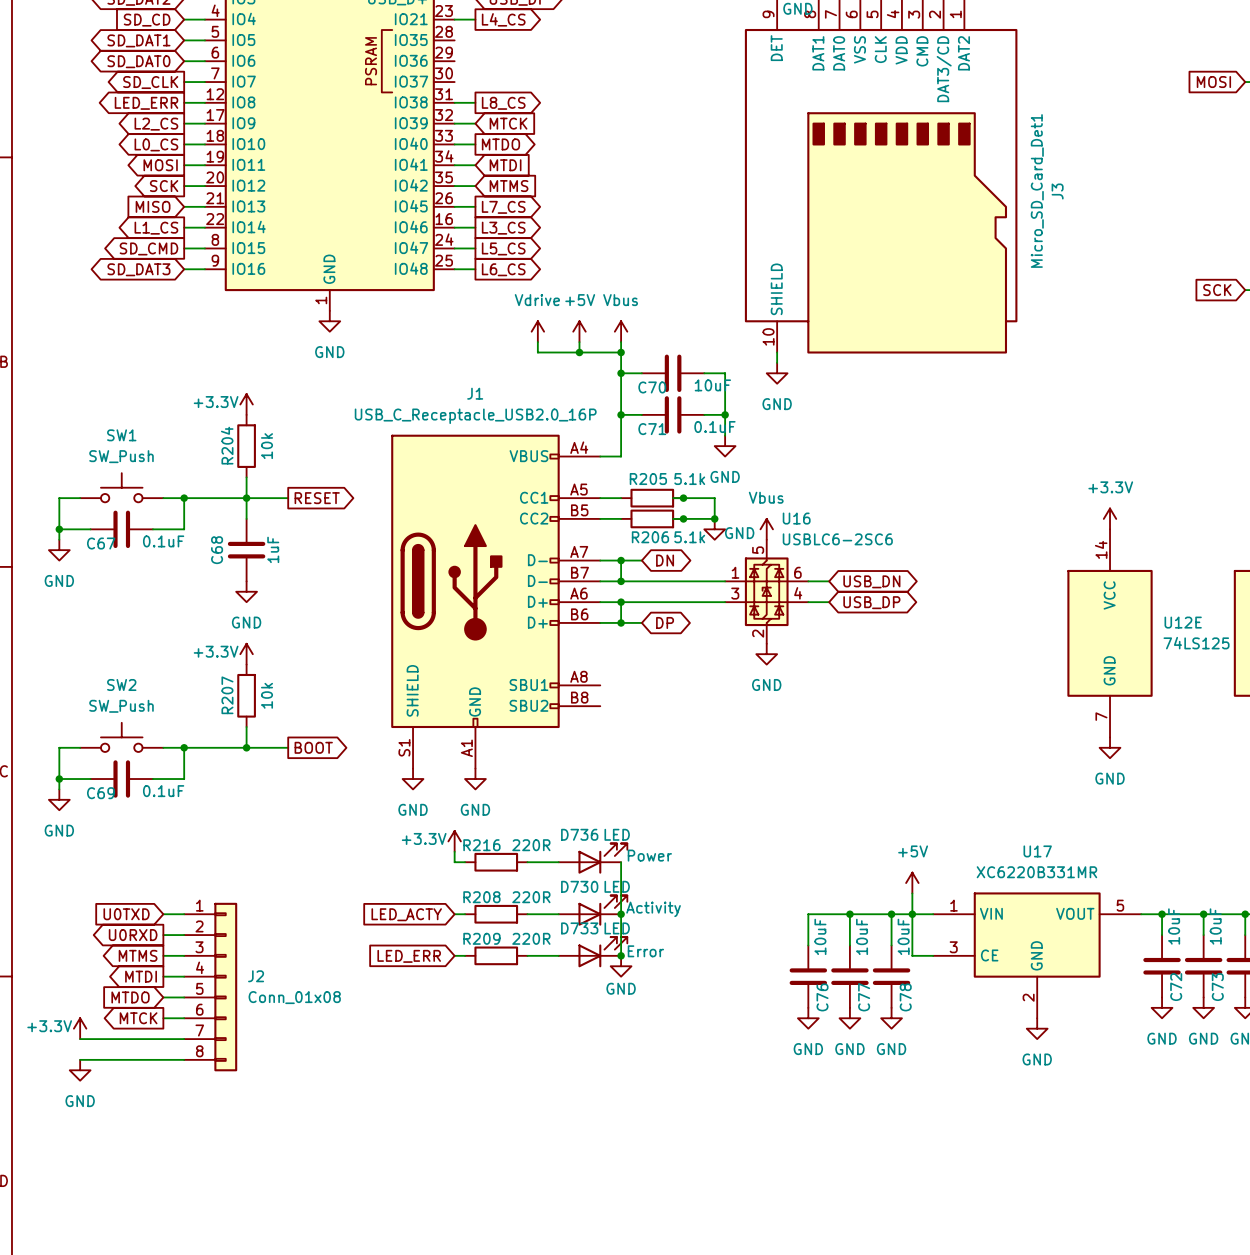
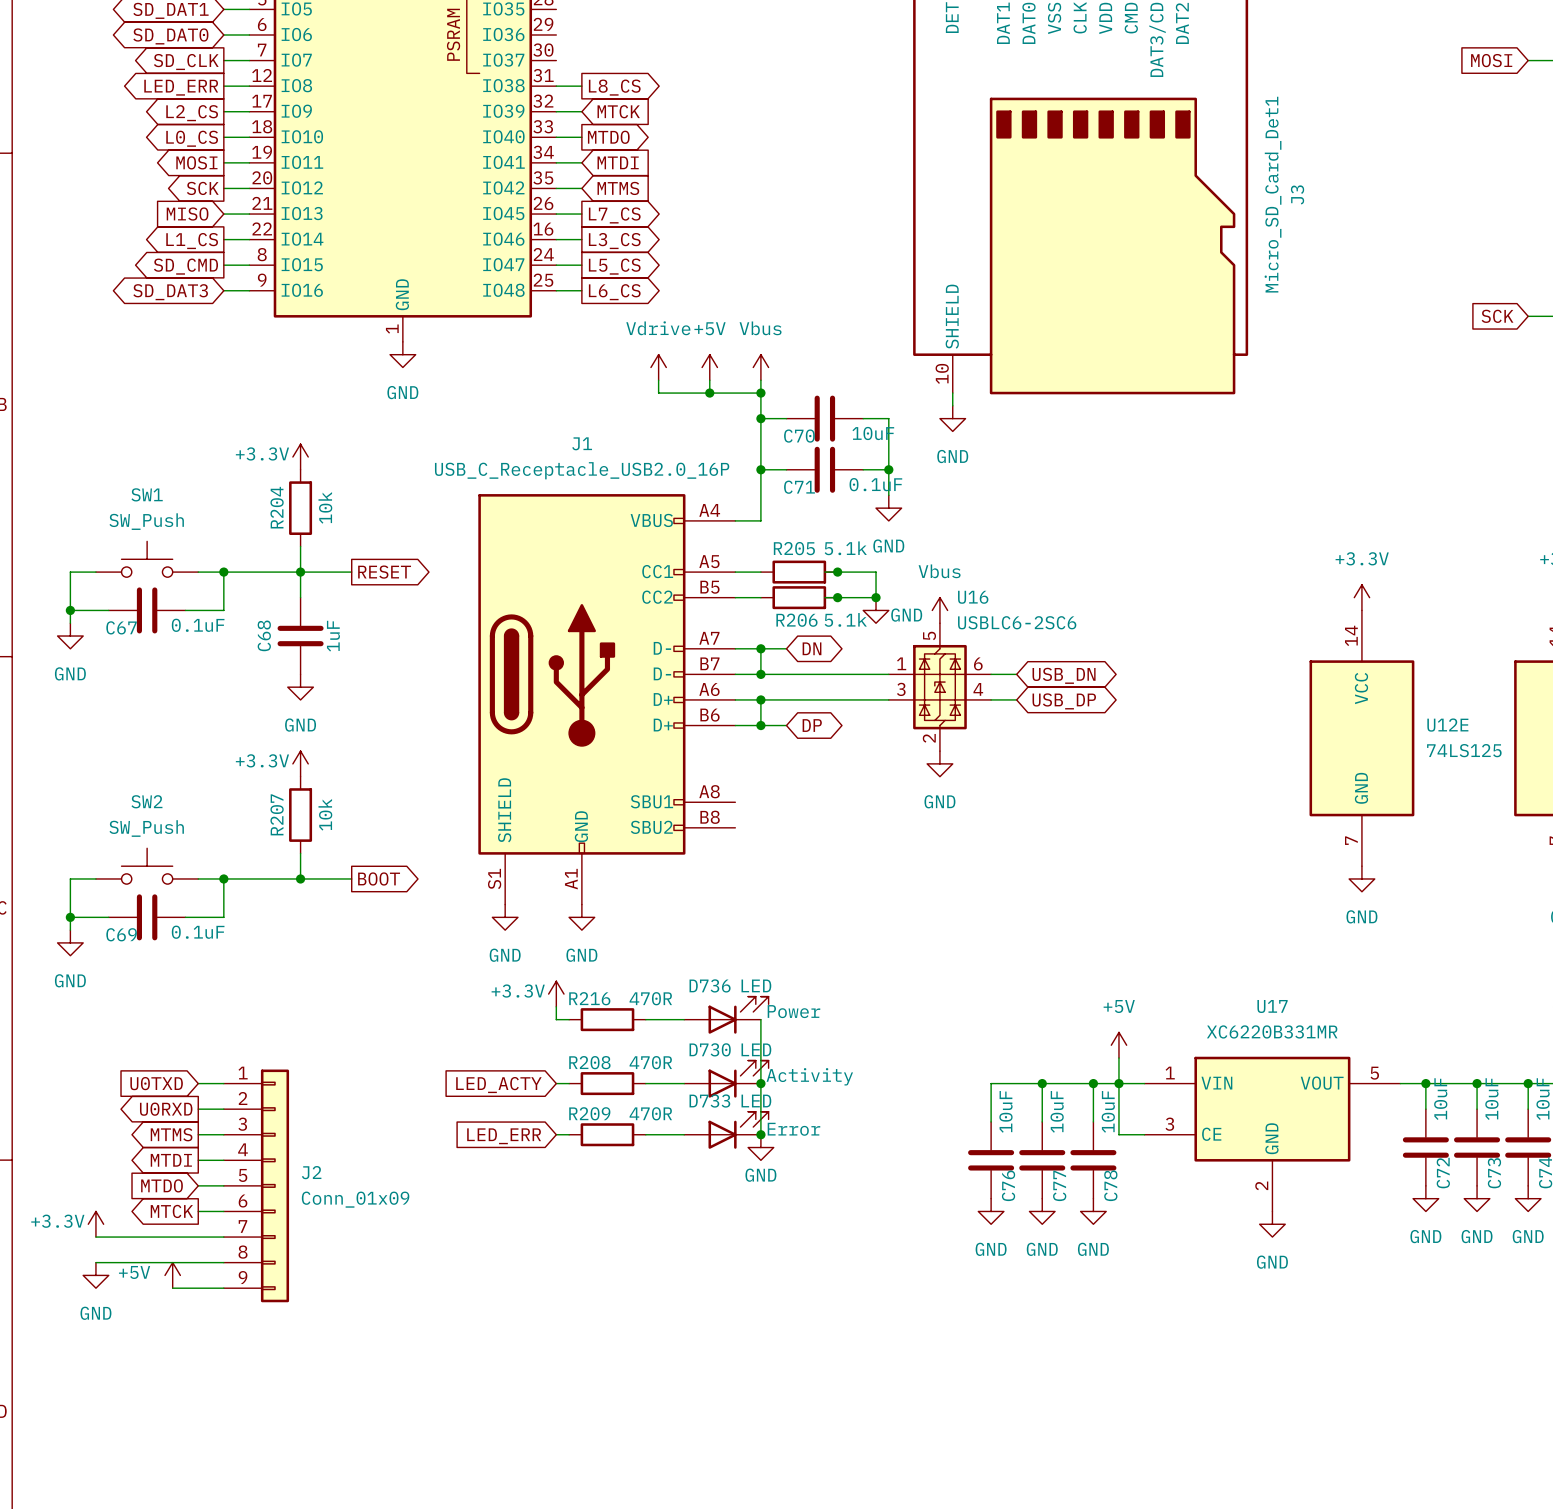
R216 value: 220R (531, 845) -> 470R (650, 998)
R208 value: 220R (531, 897) -> 470R (650, 1062)
J2 symbol: [184, 902, 238, 1072] -> [223, 1069, 290, 1303]
R209 value: 220R (531, 938) -> 470R (650, 1113)
J2 value: Conn_01x08 (294, 997) -> Conn_01x09 (355, 1199)
power symbol: none -> +5V (172, 1275)
wire: none -> (172, 1288) (223, 1288)

